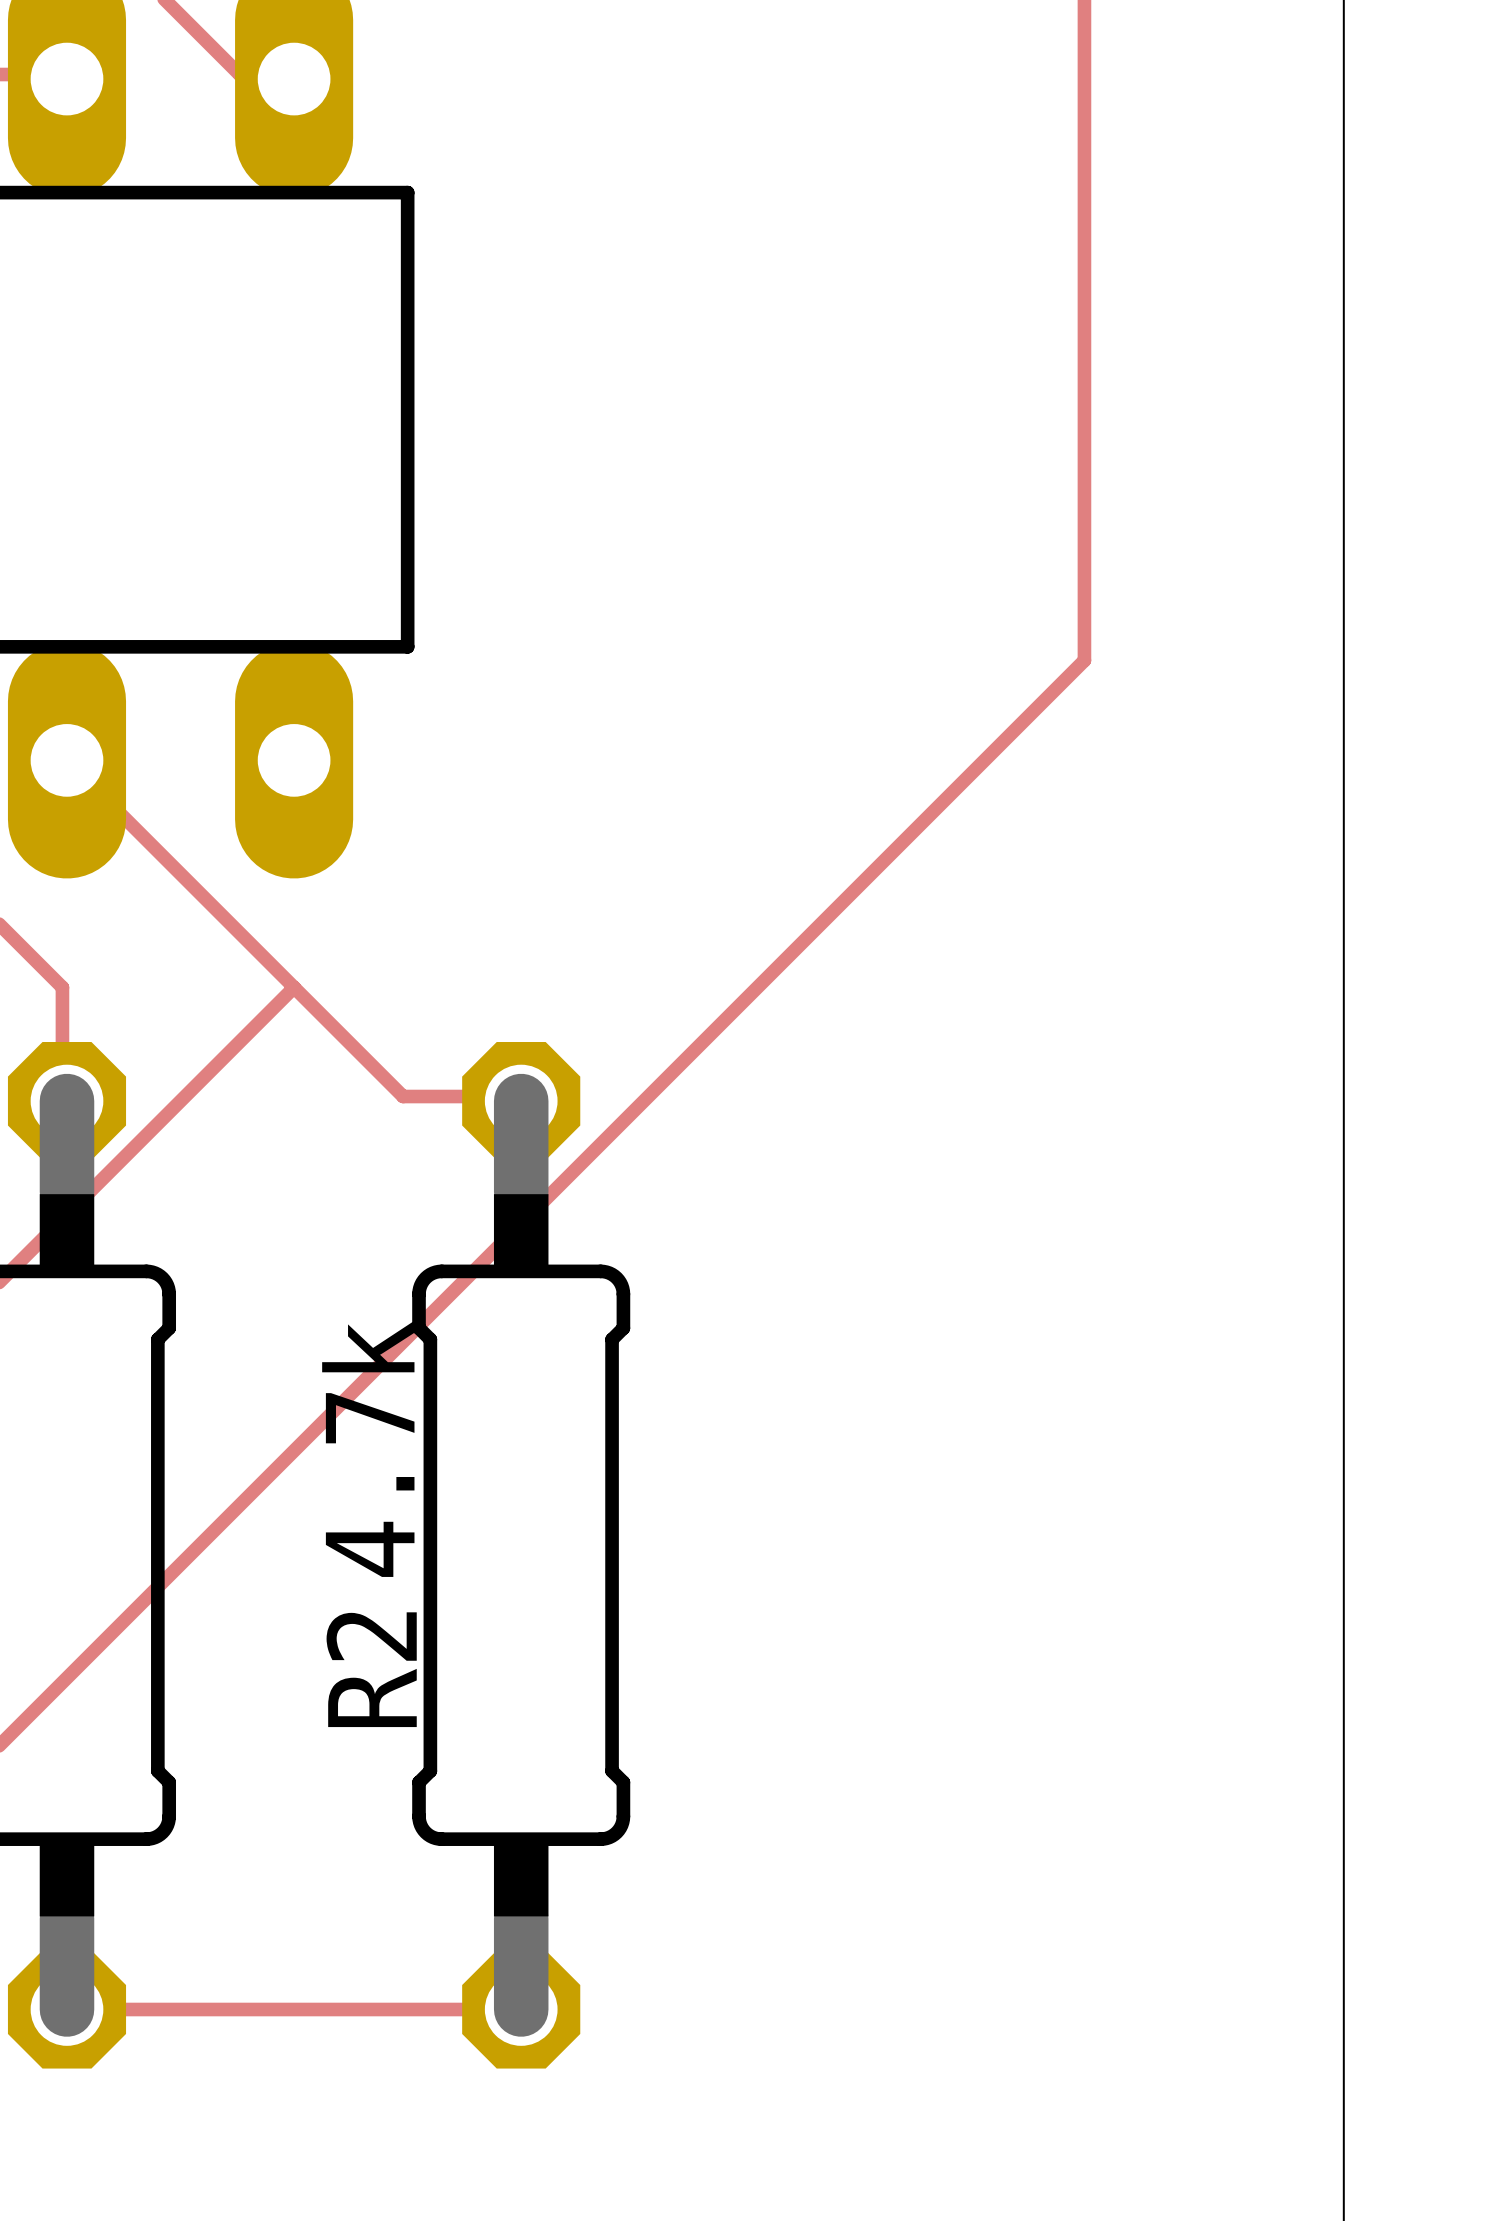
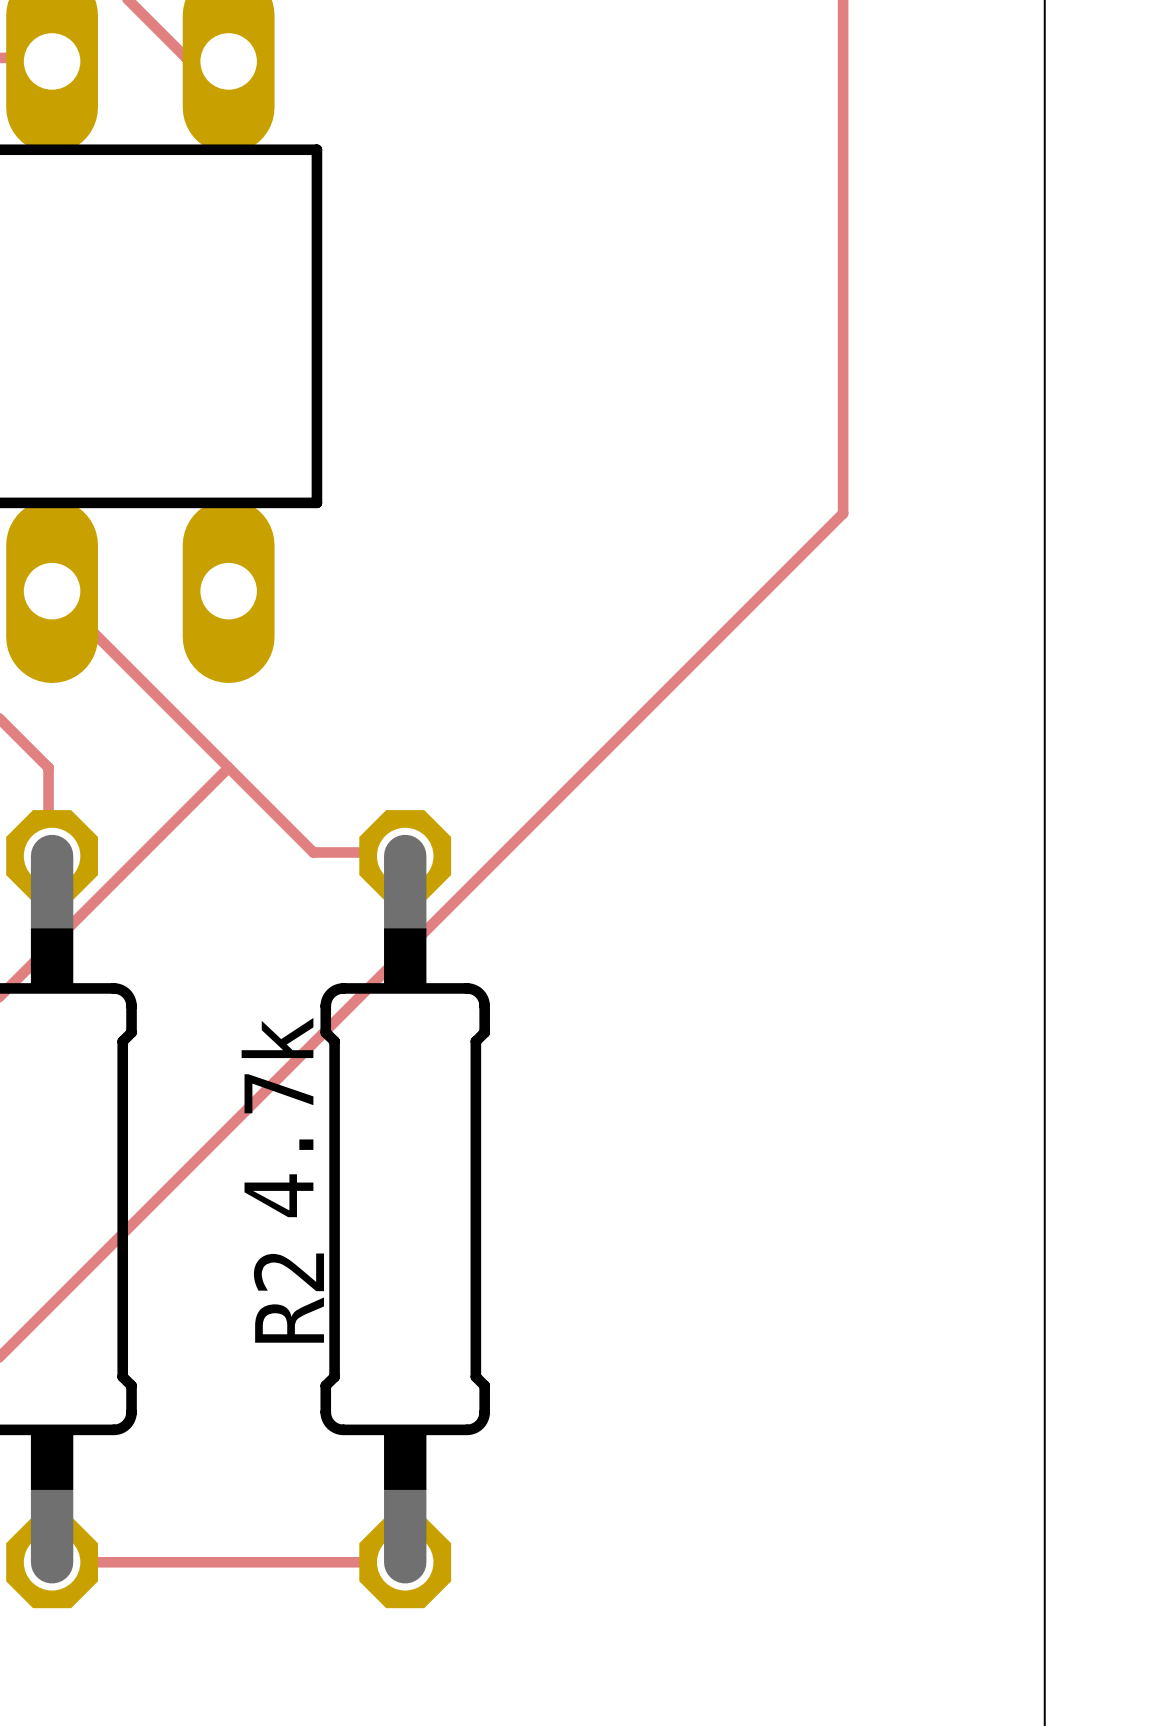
R2 value position: 4.7k (368, 1448) -> 4.7k (277, 1117)

